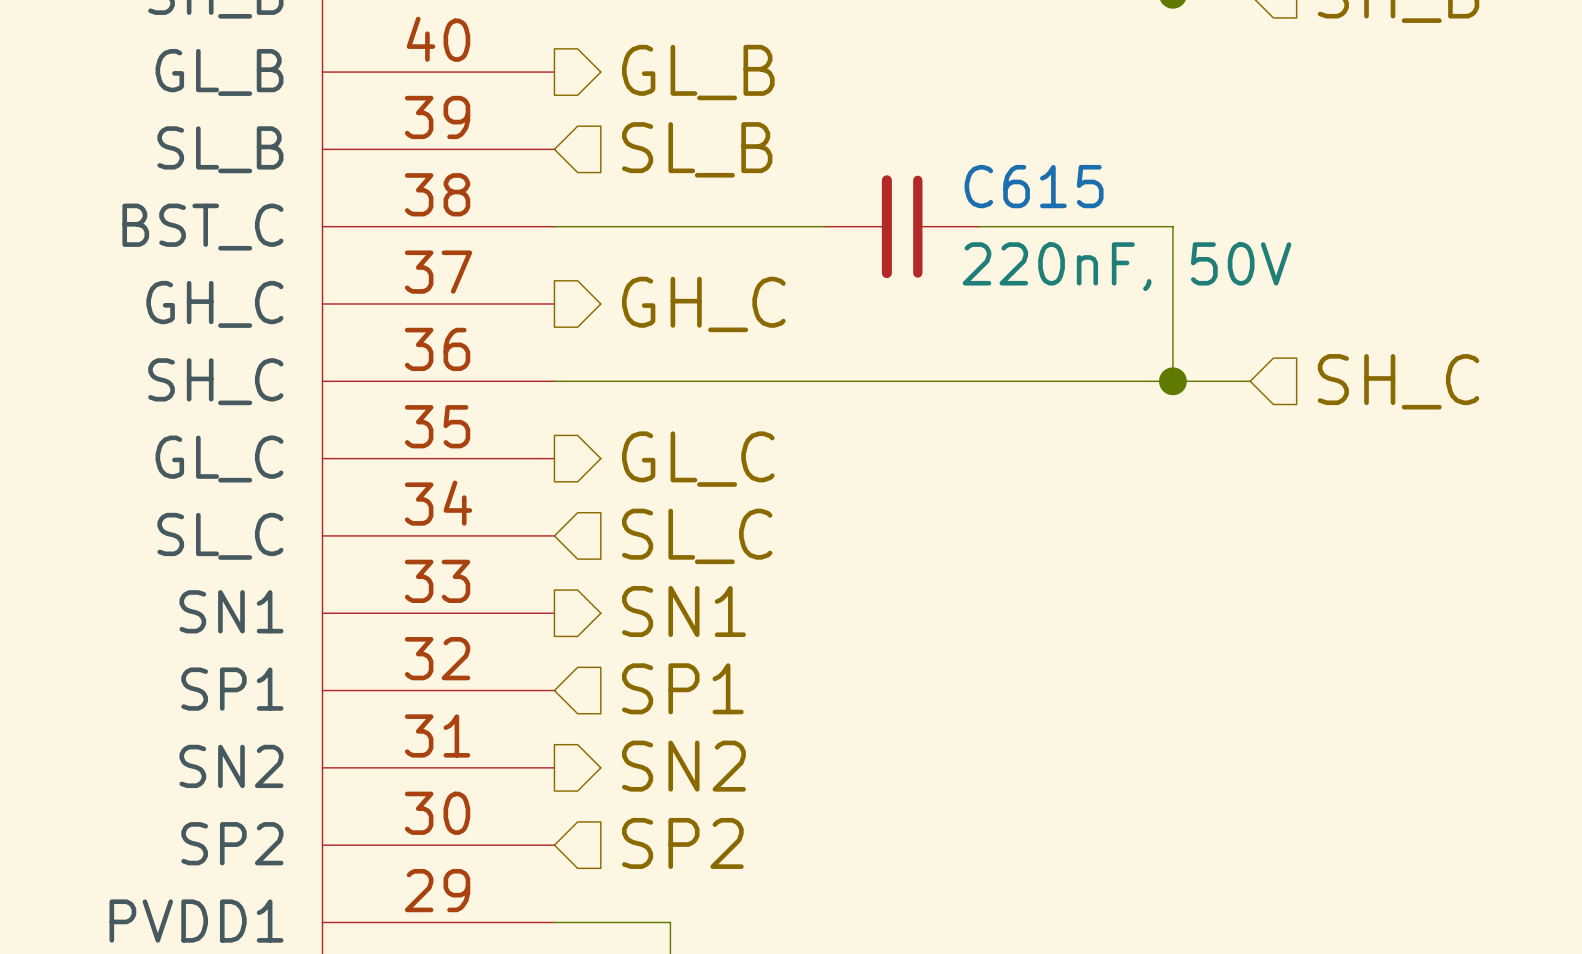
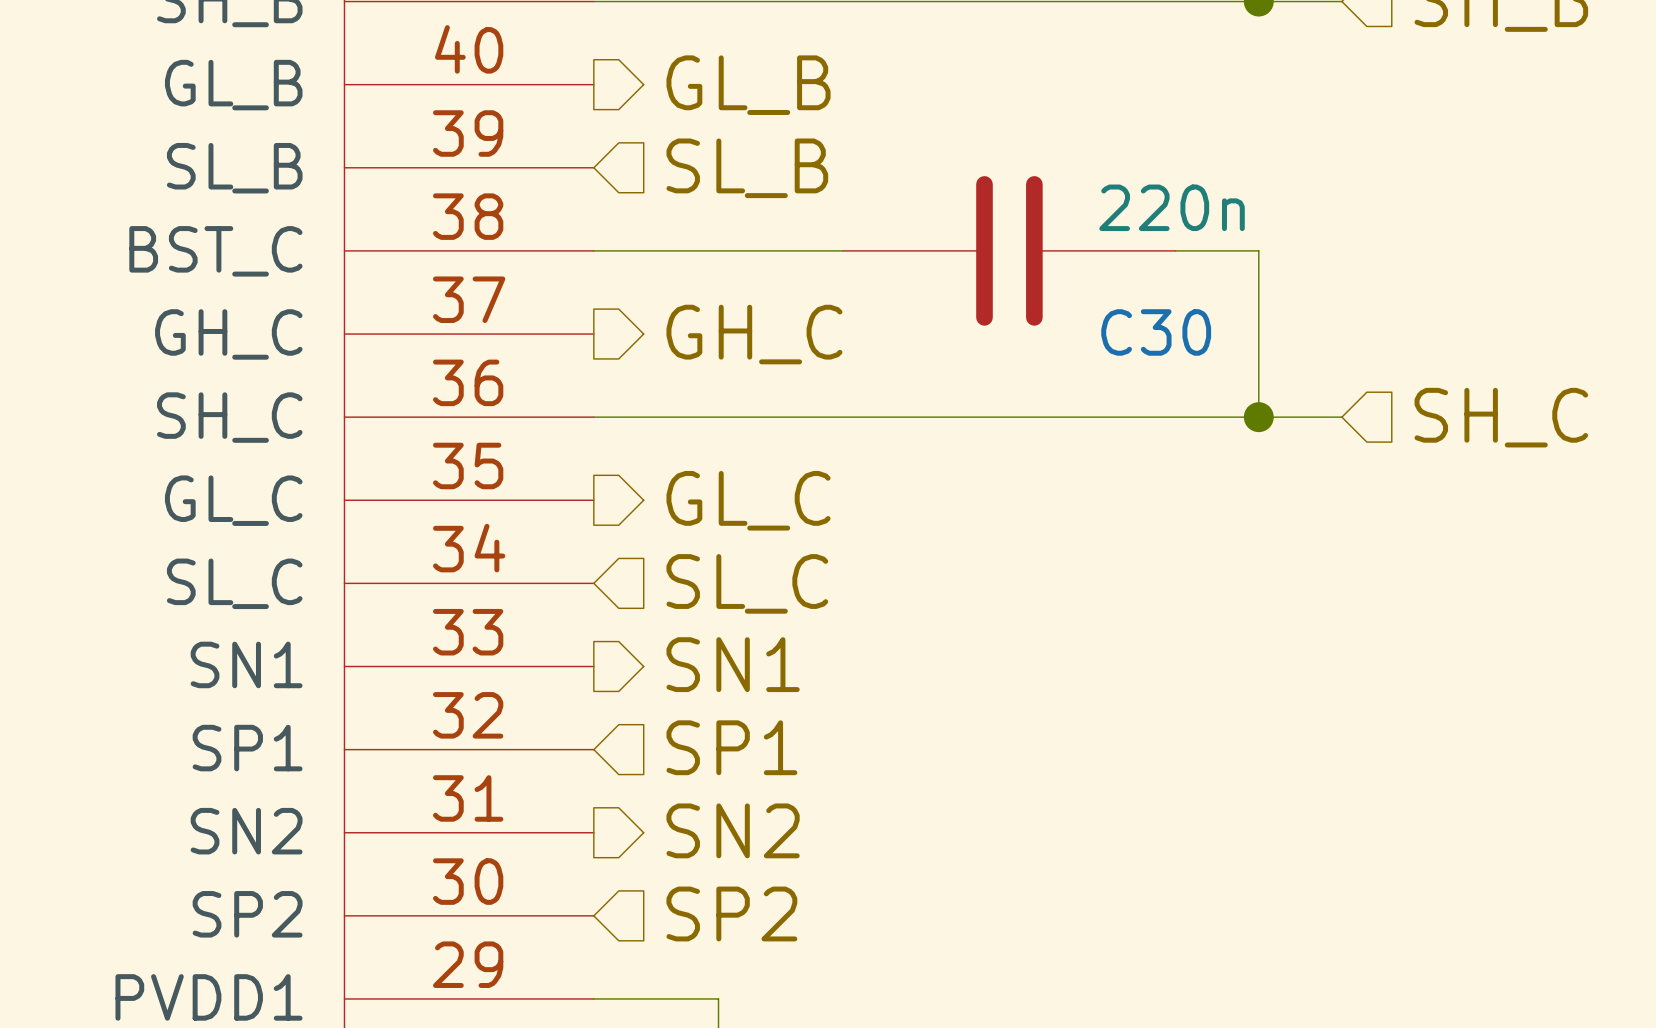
C615: 220nF, 50V (902, 226) -> none
C30: none -> 220n (1009, 250)

